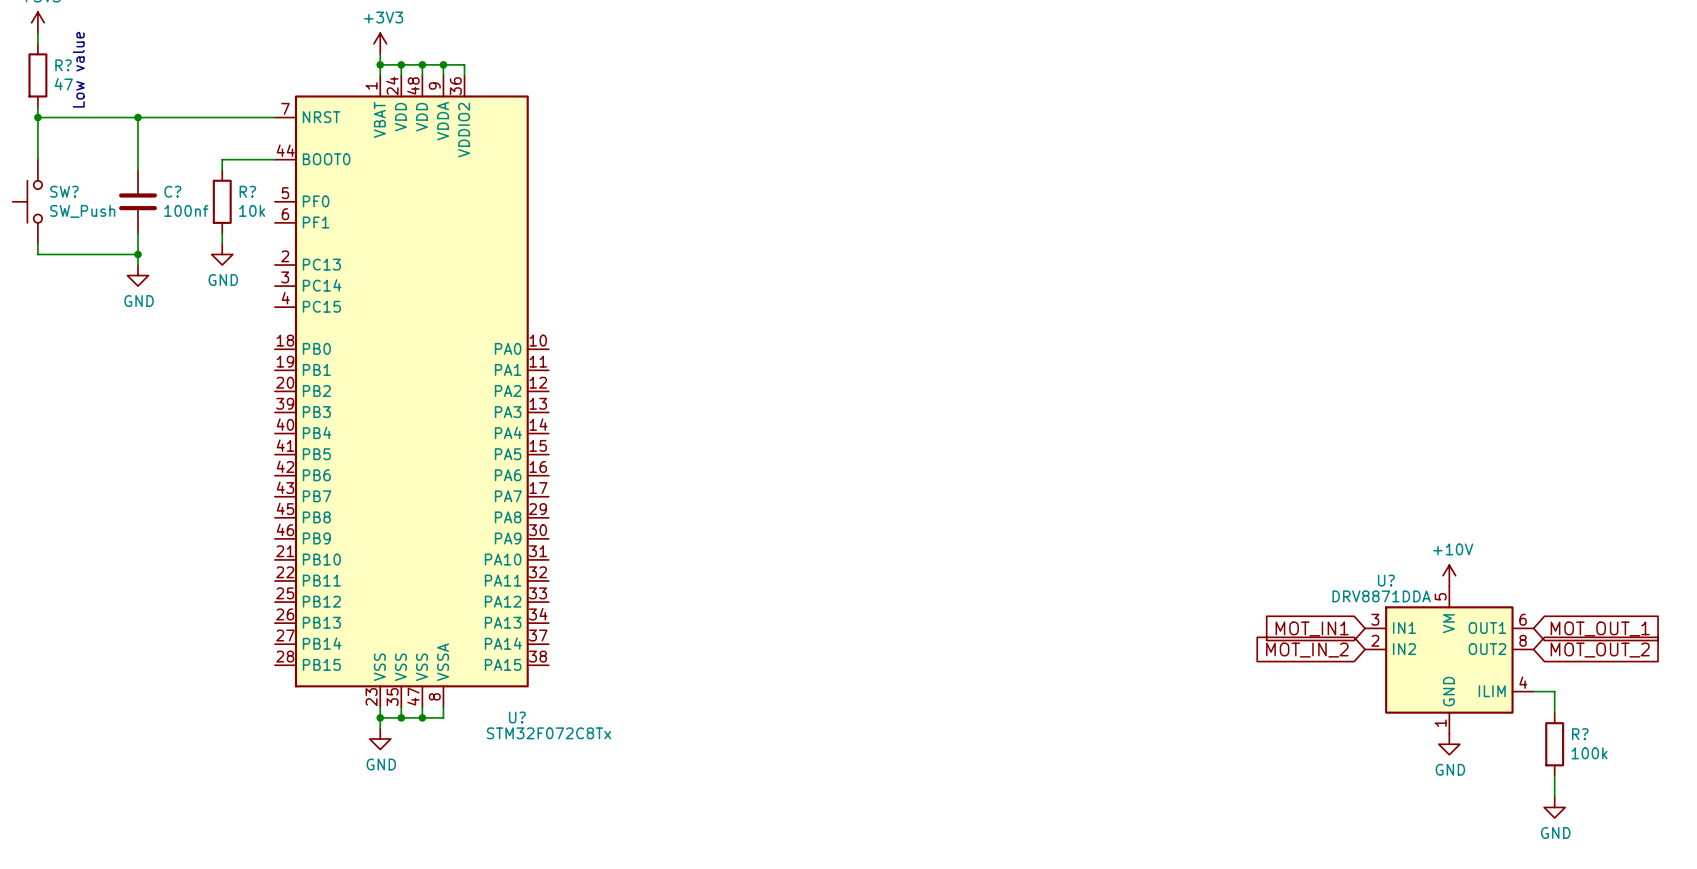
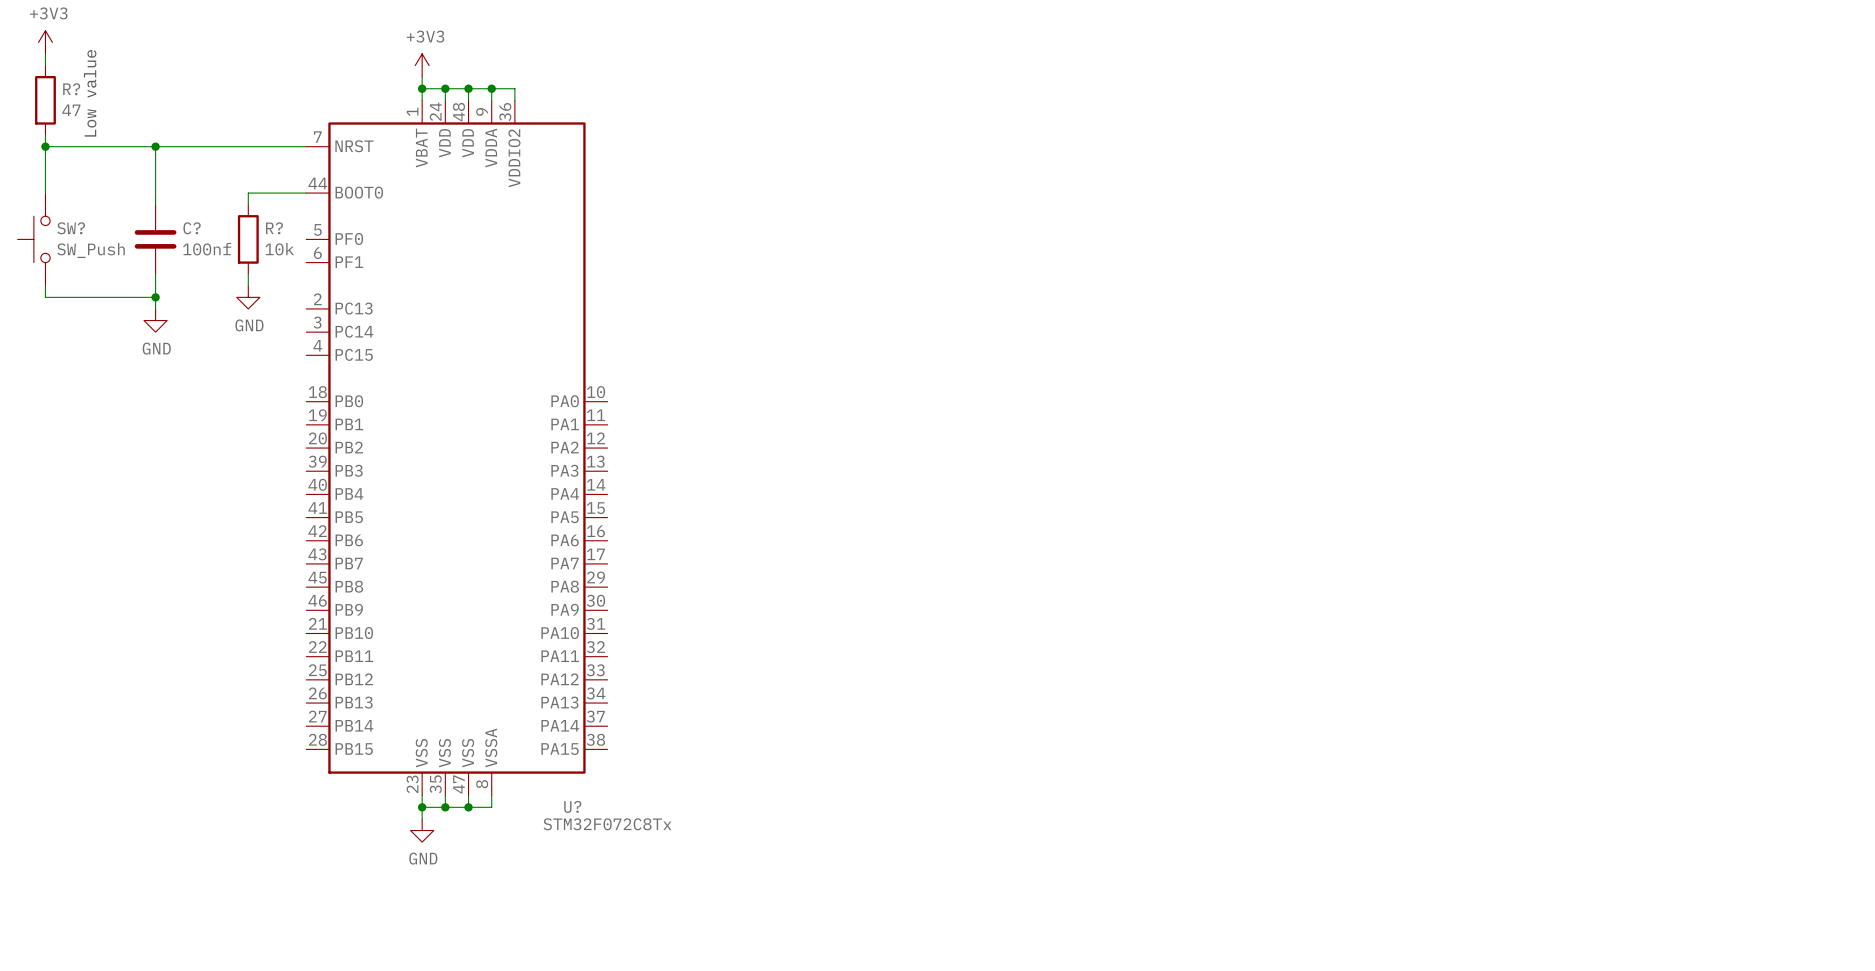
power symbol: +10V (1449, 575) -> none
global label: MOT_IN1 (1312, 628) -> none
global label: MOT_OUT_1 (1600, 628) -> none
global label: MOT_IN_2 (1307, 650) -> none
global label: MOT_OUT_2 (1600, 650) -> none
U?: DRV8871DDA (1449, 660) -> none
wire: (1533, 691) (1554, 691) (1554, 712) -> none
power symbol: GND (1449, 744) -> none
R?: 100k (1554, 744) -> none
wire: (1554, 775) (1554, 796) -> none
power symbol: GND (1554, 807) -> none

